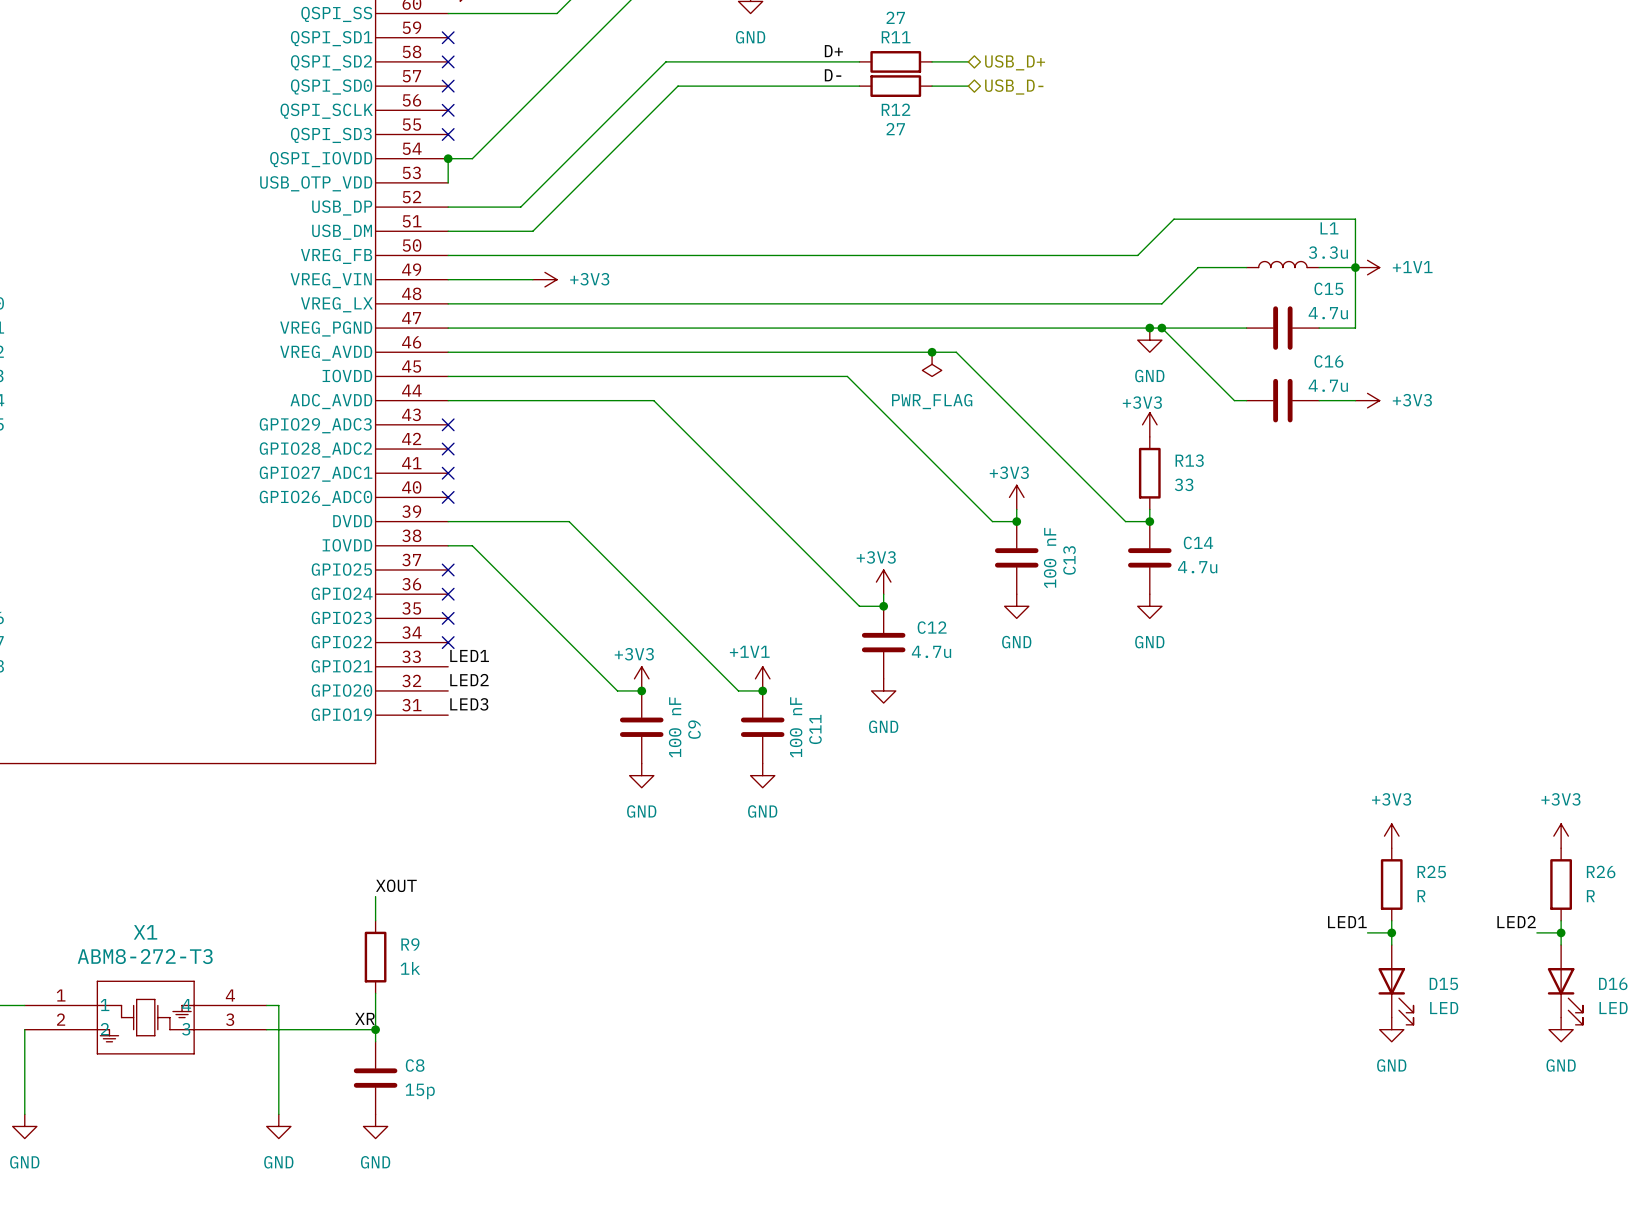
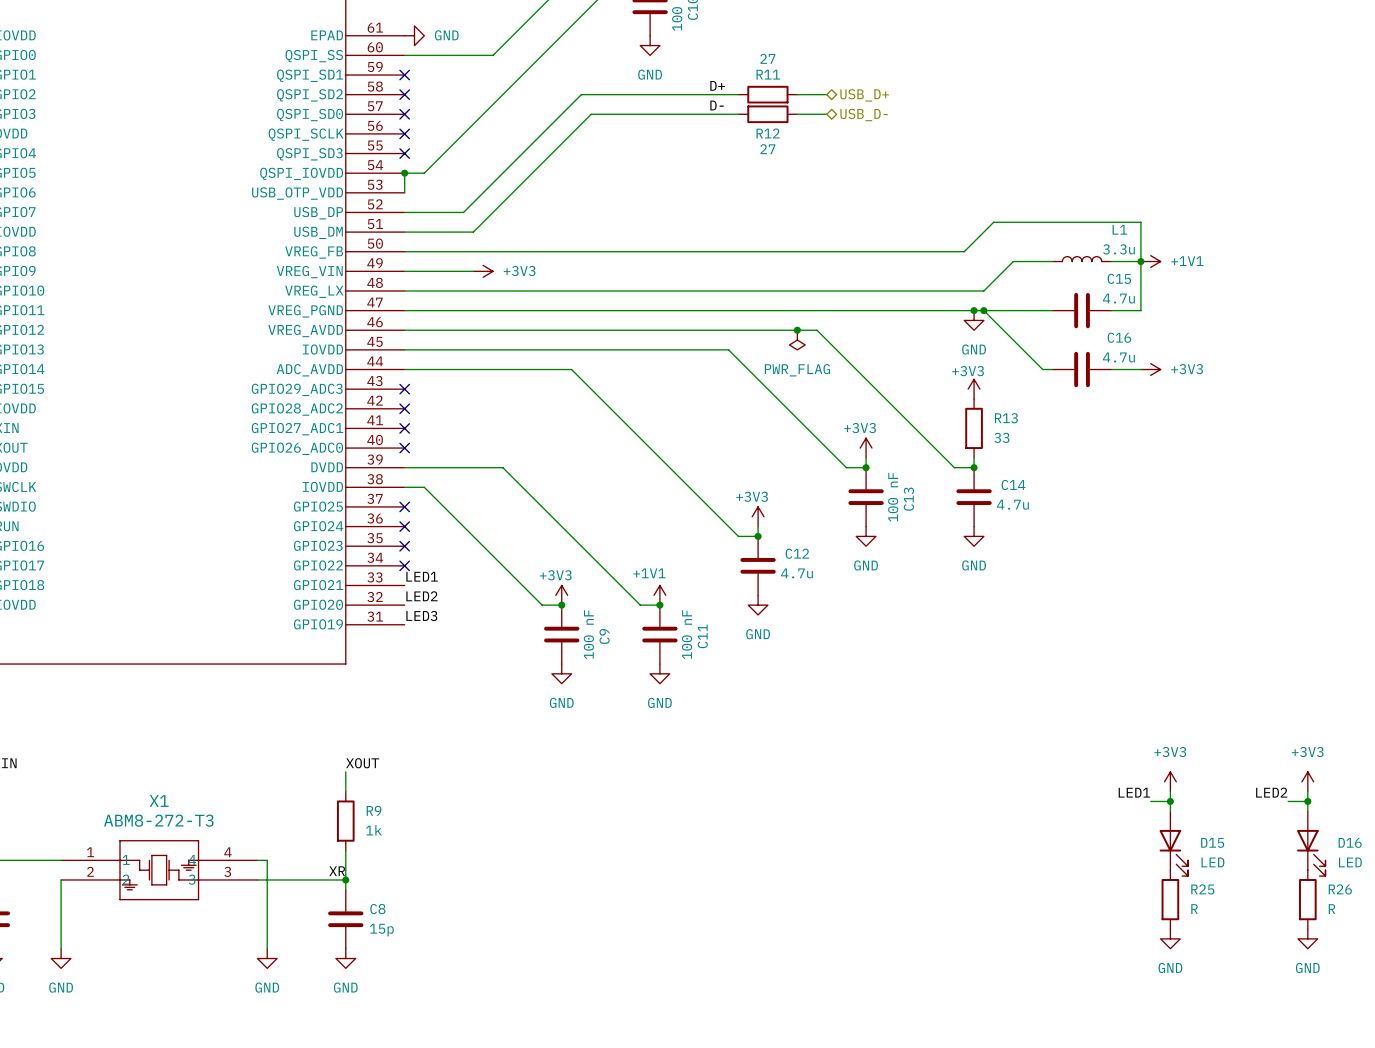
power symbol position: +3V3 (1391, 836) -> +3V3 (1170, 781)
power symbol position: +3V3 (1561, 836) -> +3V3 (1307, 781)
R25 position: (1391, 884) -> (1170, 899)
R26 position: (1561, 884) -> (1307, 899)
power symbol position: GND (1391, 1029) -> GND (1170, 938)
power symbol position: GND (1561, 1029) -> GND (1307, 938)

